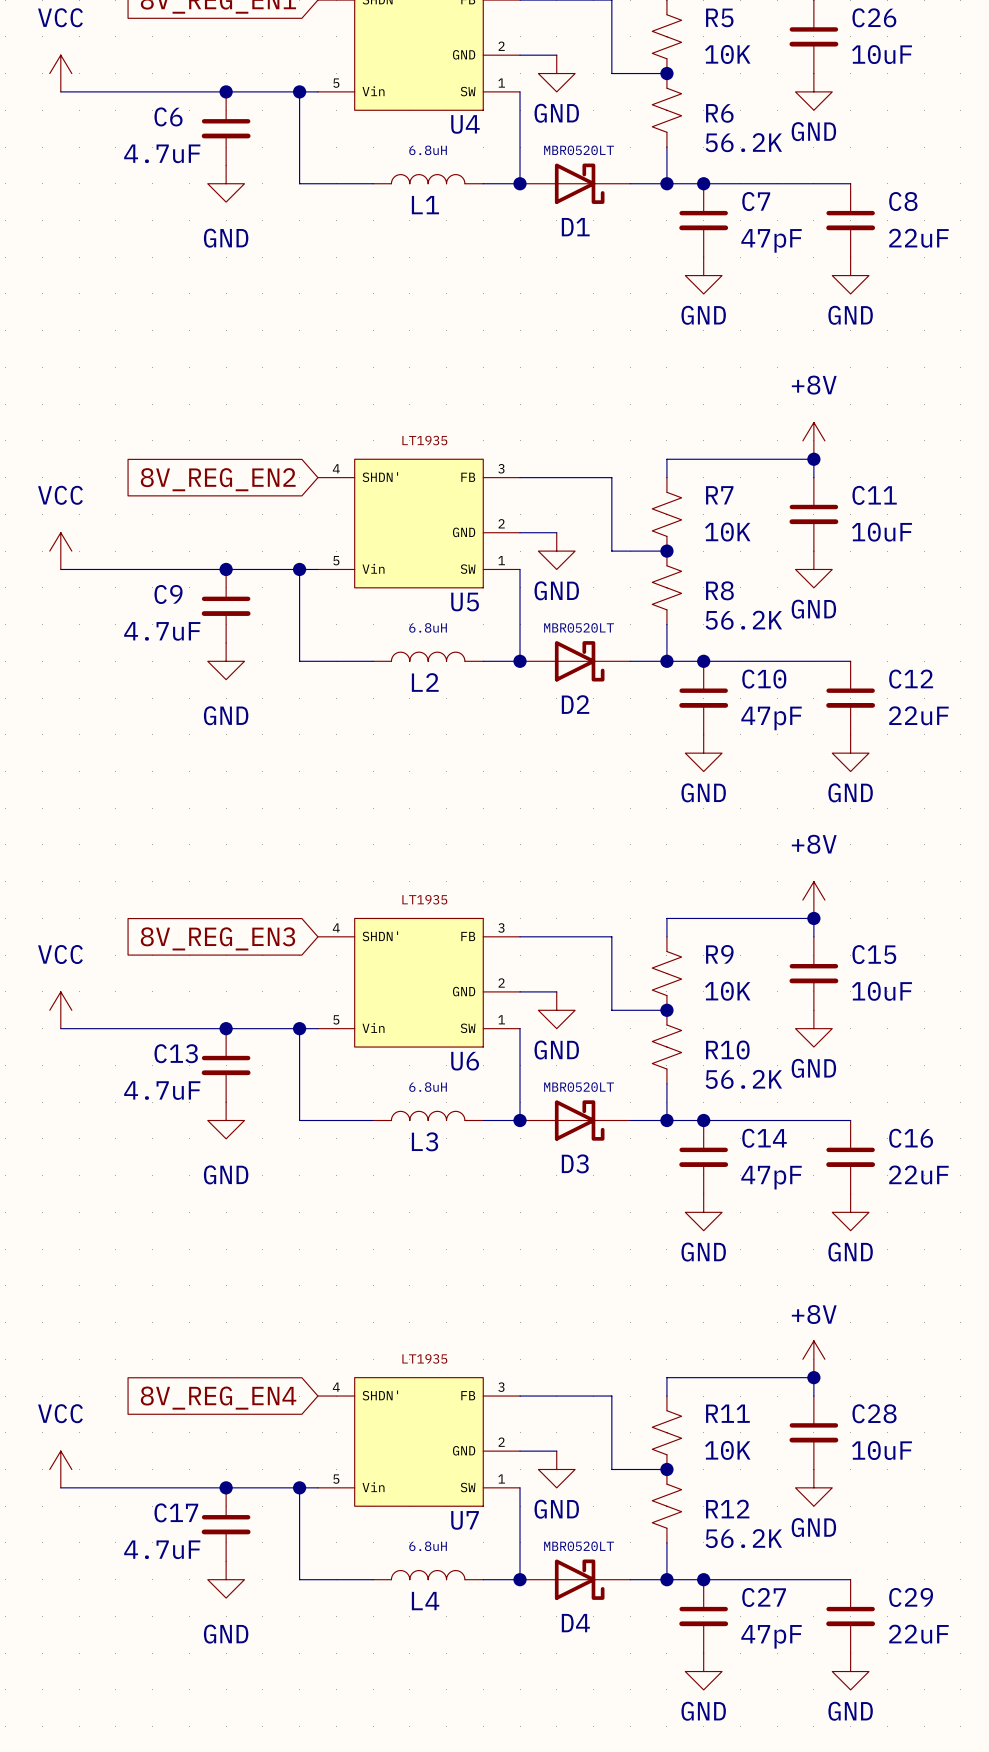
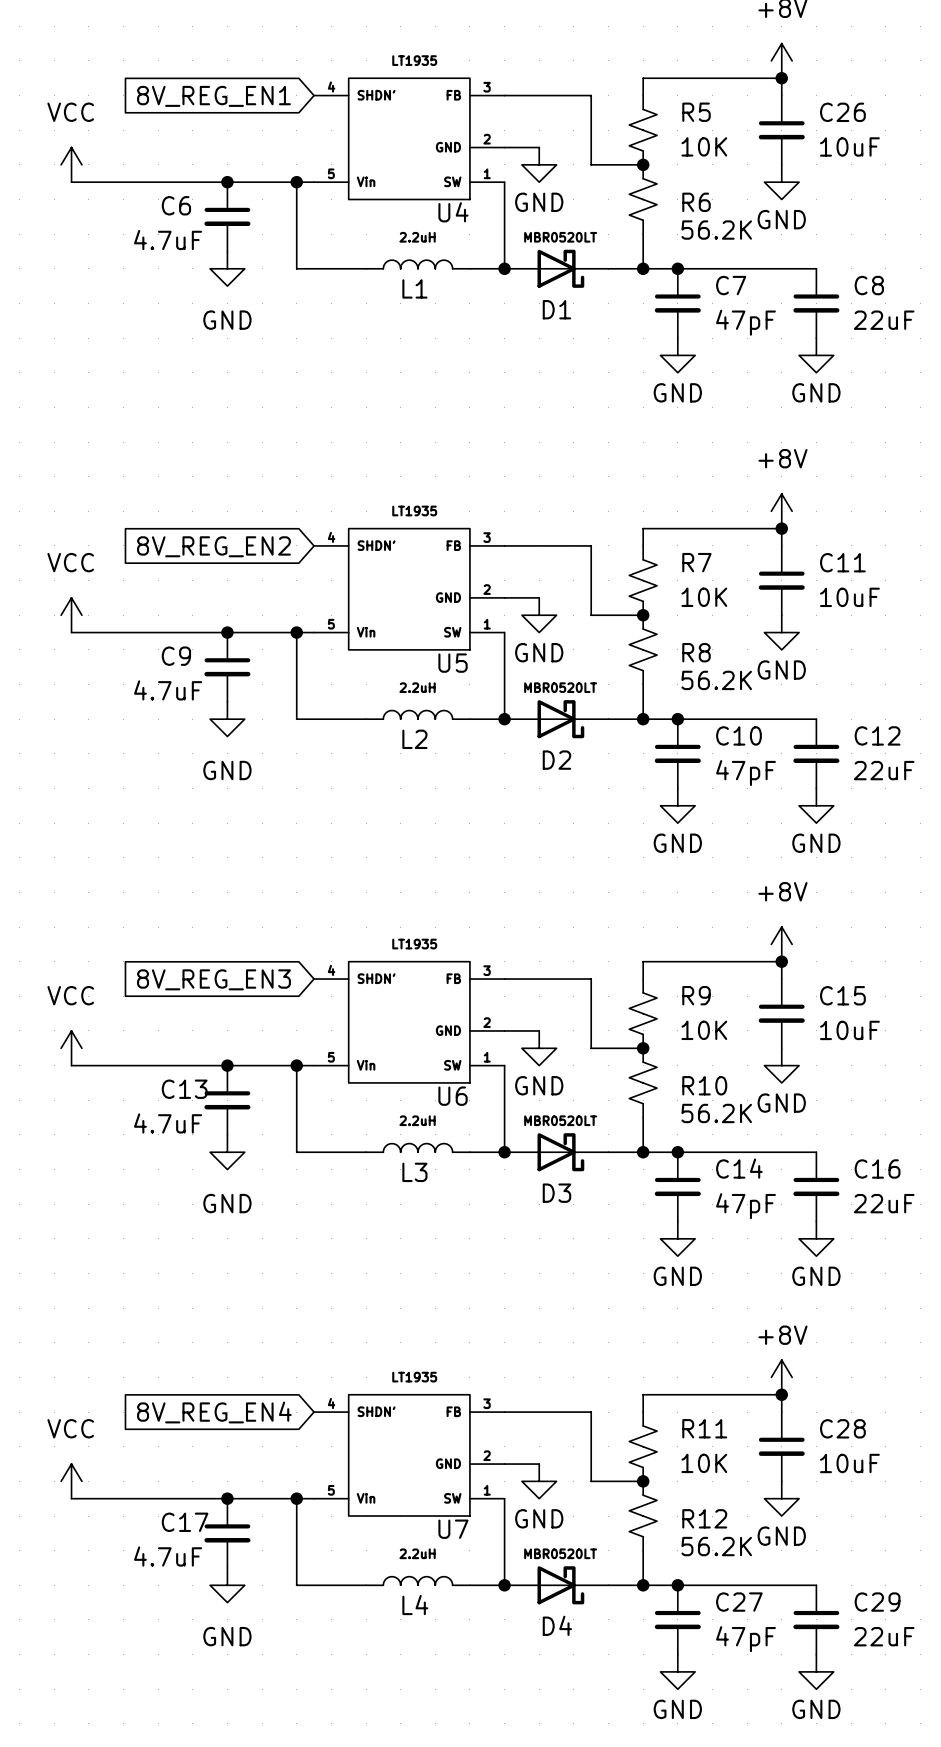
L1 value: 6.8uH (428, 150) -> 2.2uH (417, 237)
L2 value: 6.8uH (428, 627) -> 2.2uH (417, 687)
L3 value: 6.8uH (428, 1087) -> 2.2uH (417, 1120)
L4 value: 6.8uH (428, 1546) -> 2.2uH (417, 1553)

